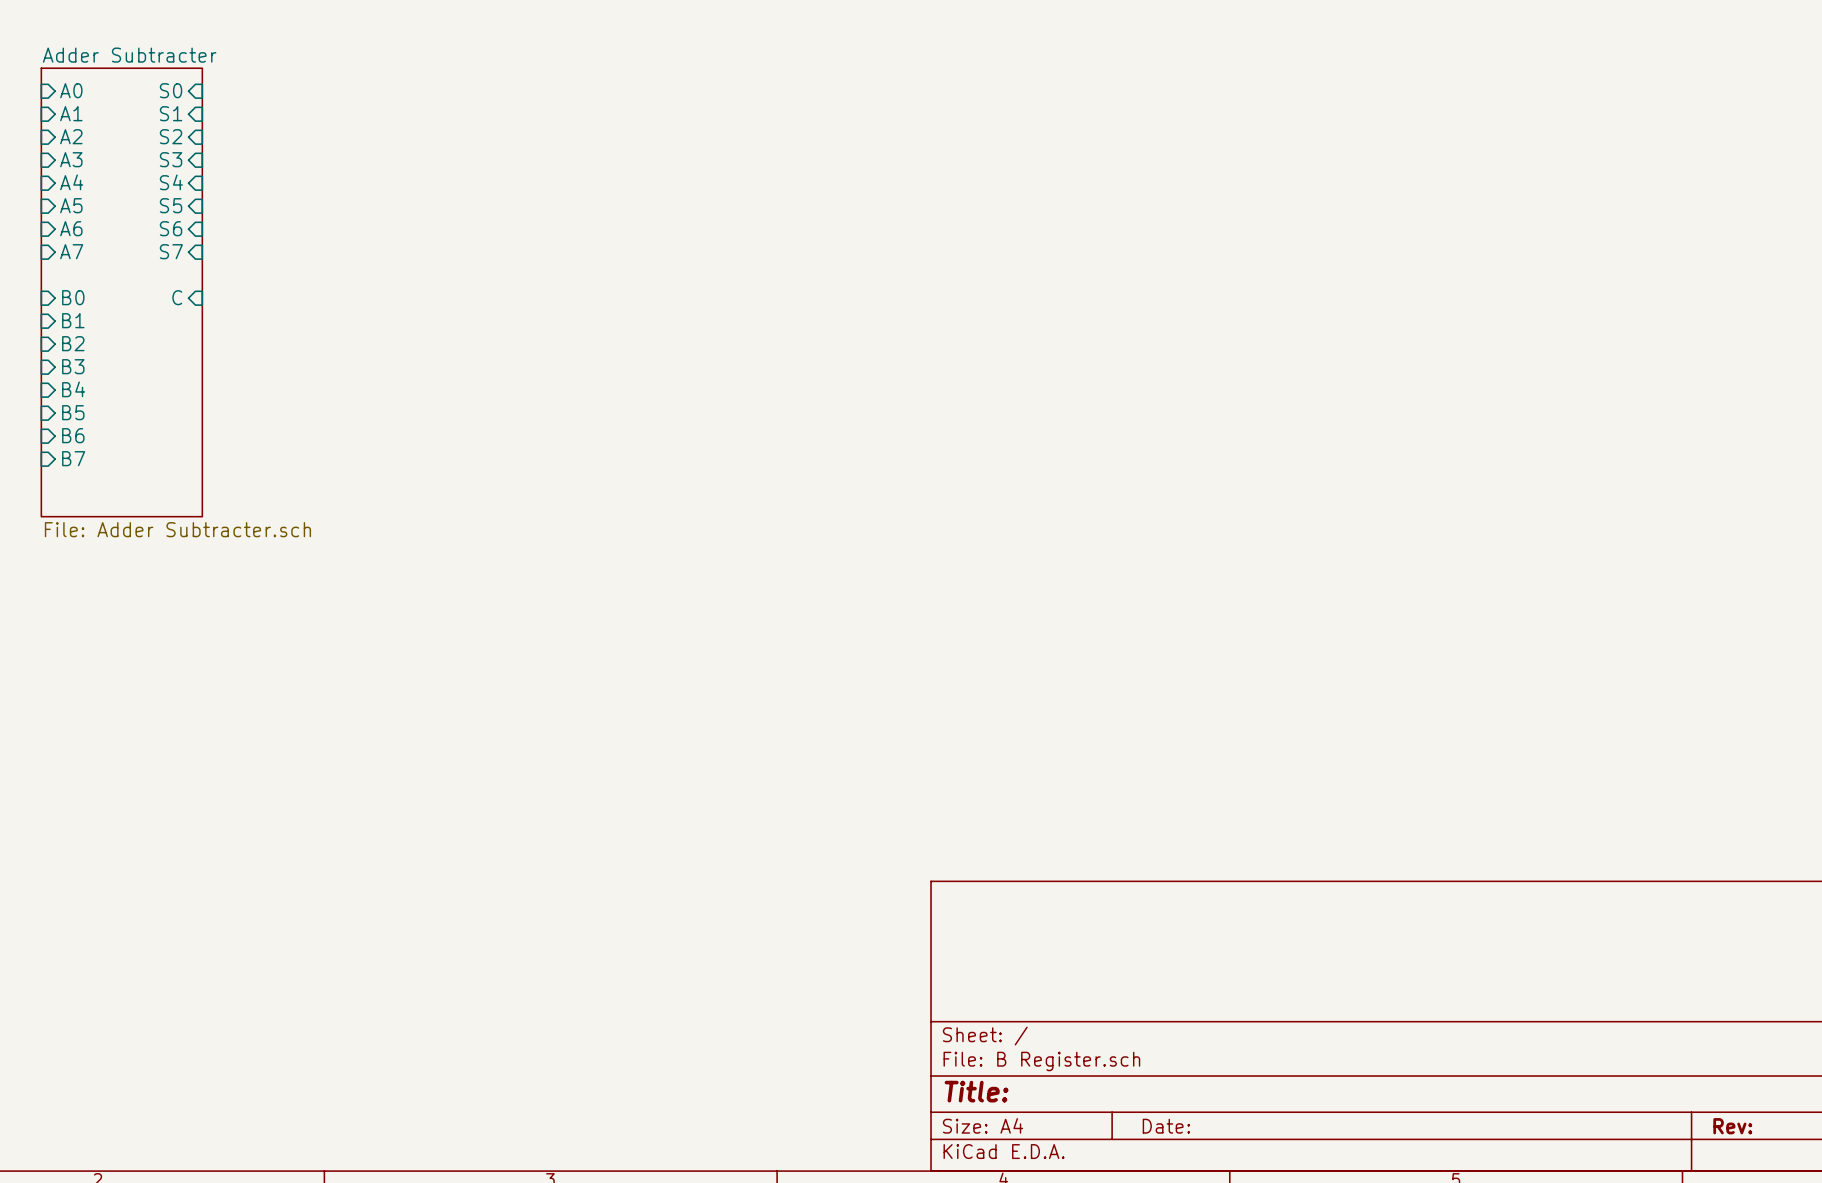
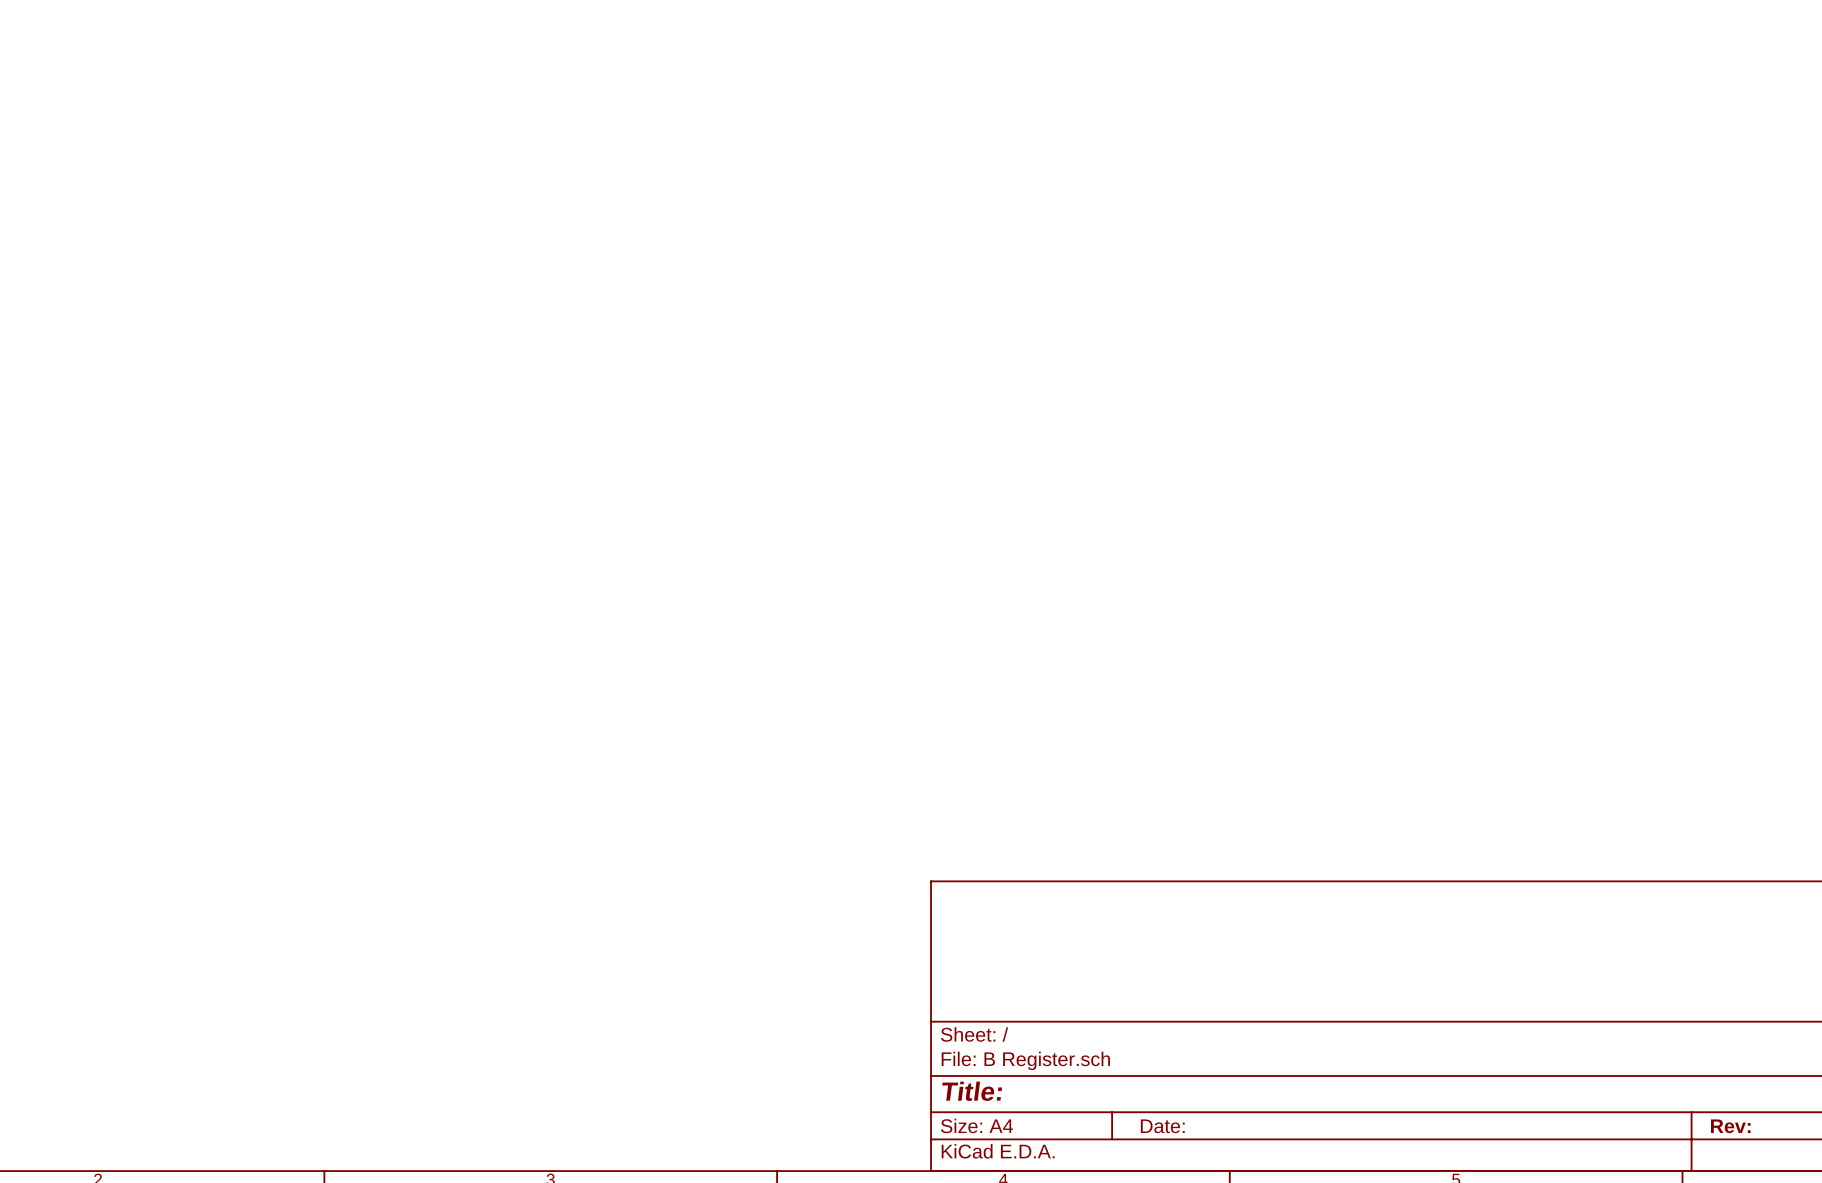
sheet pin: A0 (71, 90) -> none
sheet pin: S0 (171, 90) -> none
sheet pin: A1 (71, 113) -> none
sheet pin: S1 (171, 113) -> none
sheet pin: A2 (71, 136) -> none
sheet pin: S2 (171, 136) -> none
sheet pin: A3 (71, 159) -> none
sheet pin: S3 (171, 159) -> none
sheet pin: A4 (71, 182) -> none
sheet pin: S4 (171, 182) -> none
sheet pin: A5 (71, 205) -> none
sheet pin: S5 (171, 205) -> none
sheet pin: A6 (71, 228) -> none
sheet pin: S6 (171, 228) -> none
sheet pin: A7 (71, 251) -> none
sheet pin: S7 (171, 251) -> none
sheet Adder Subtracter: File: Adder Subtracter.sch (121, 292) -> none
sheet pin: B0 (73, 297) -> none
sheet pin: C (177, 297) -> none
sheet pin: B1 (73, 320) -> none
sheet pin: B2 (73, 343) -> none
sheet pin: B3 (73, 366) -> none
sheet pin: B4 (73, 389) -> none
sheet pin: B5 (73, 412) -> none
sheet pin: B6 (73, 435) -> none
sheet pin: B7 (73, 458) -> none

